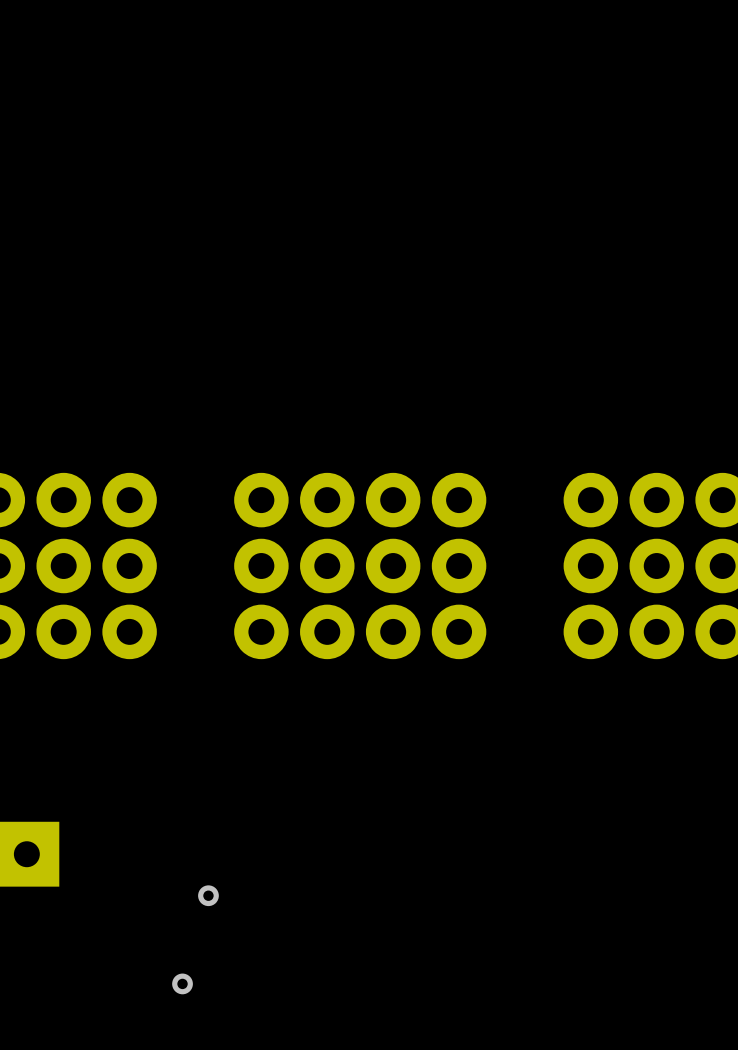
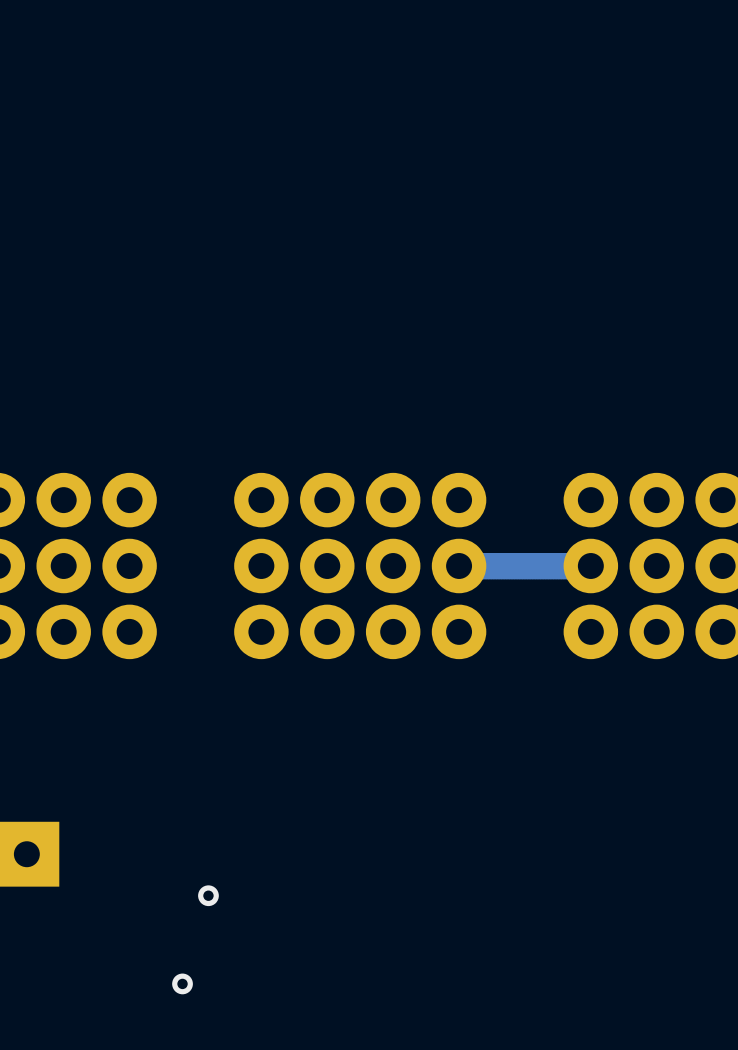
track: none -> (589, 566) (460, 566)

